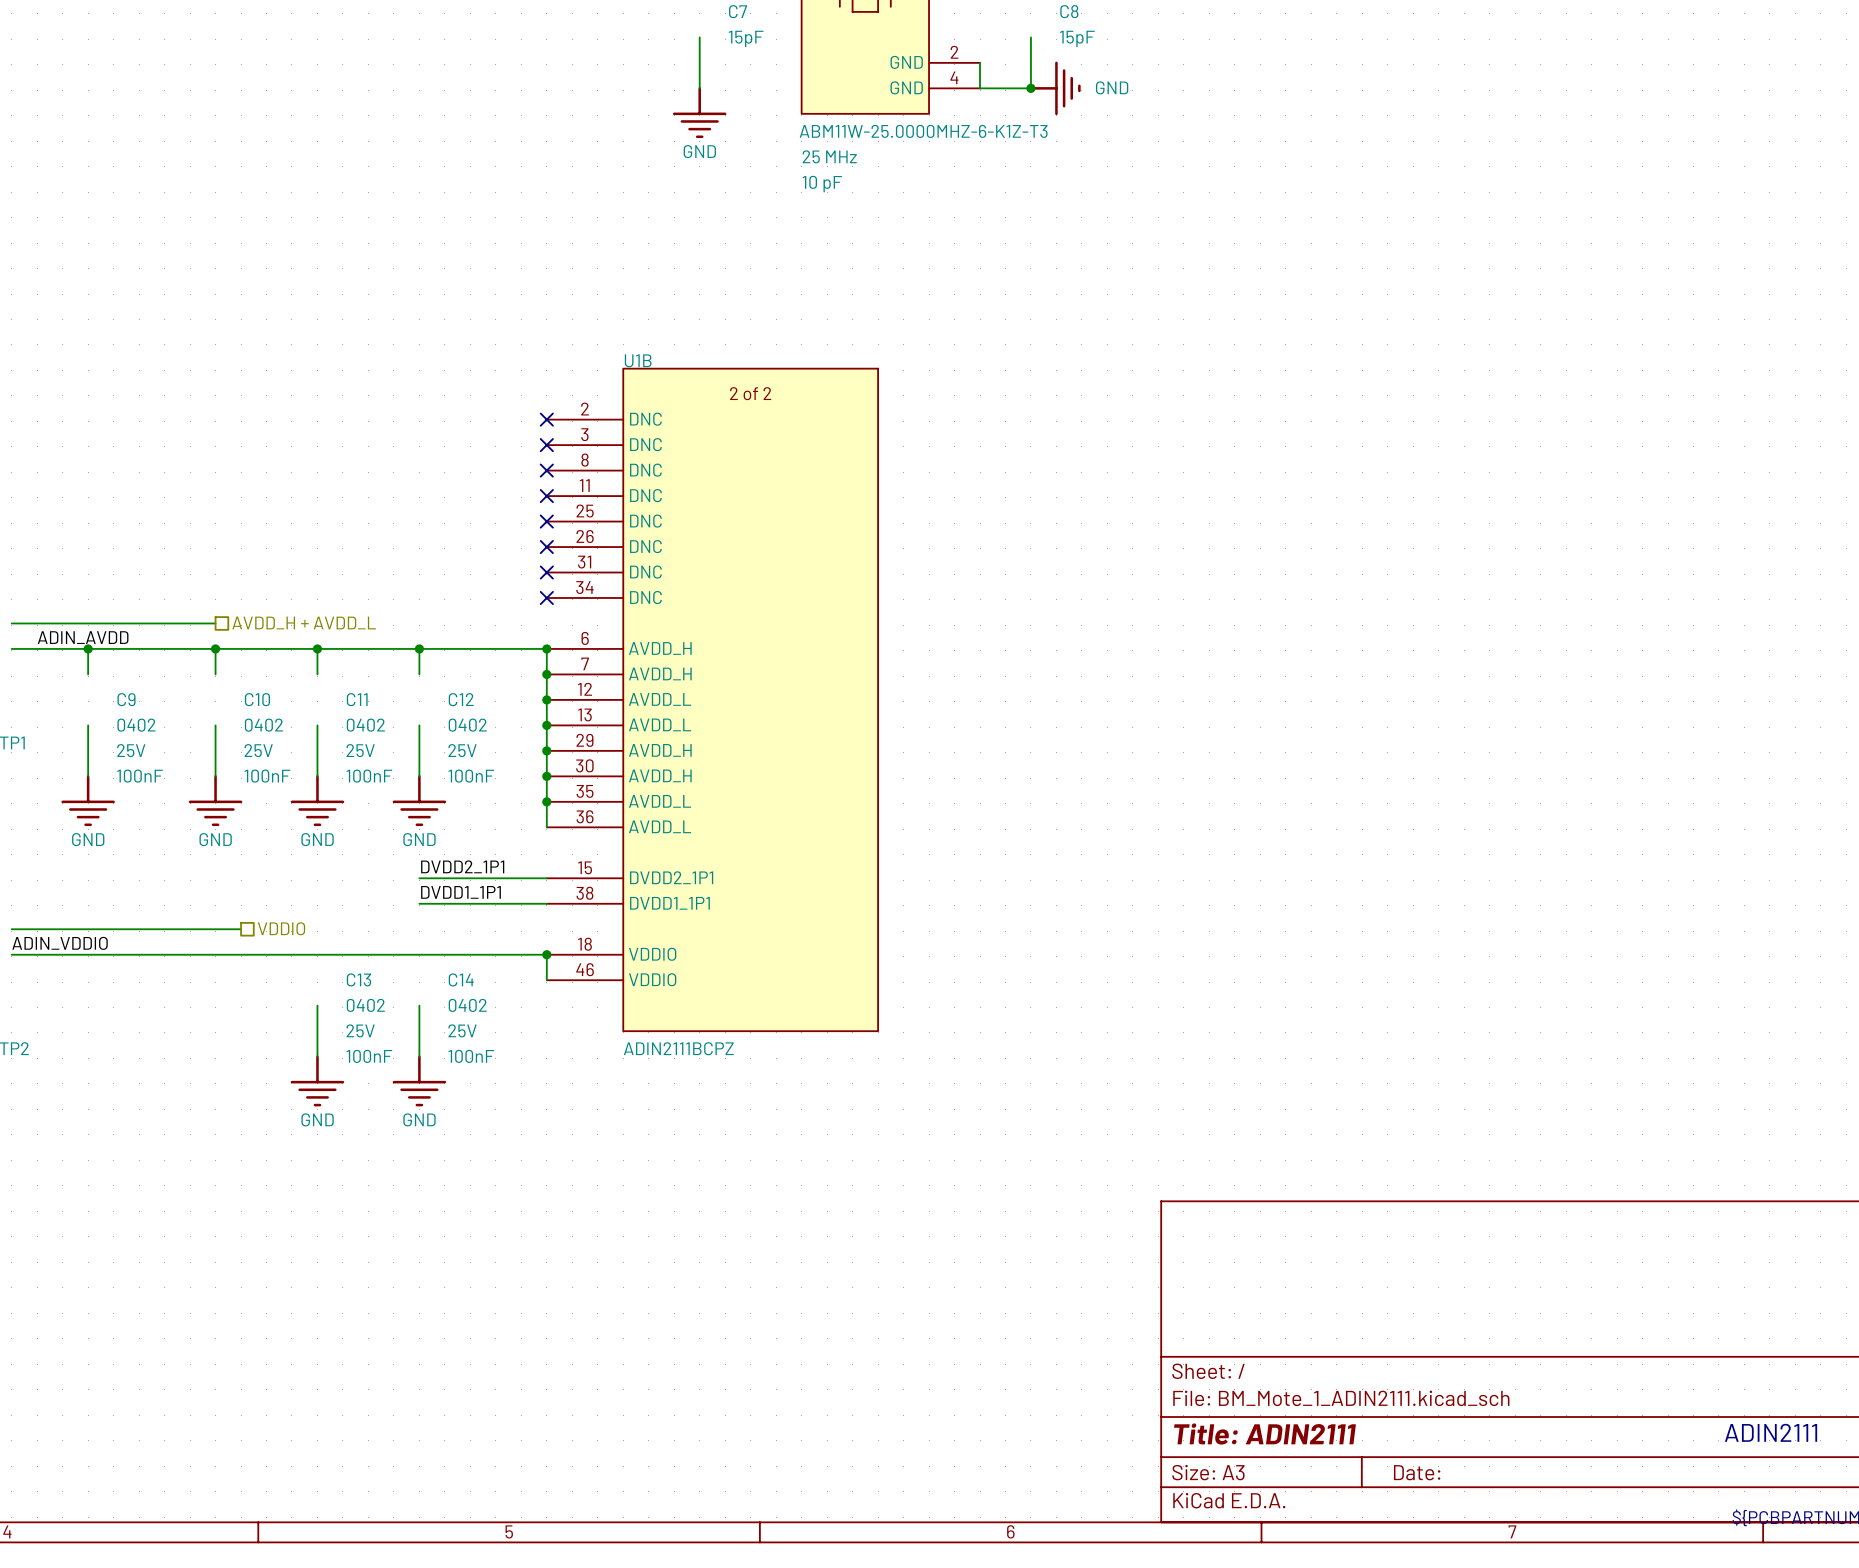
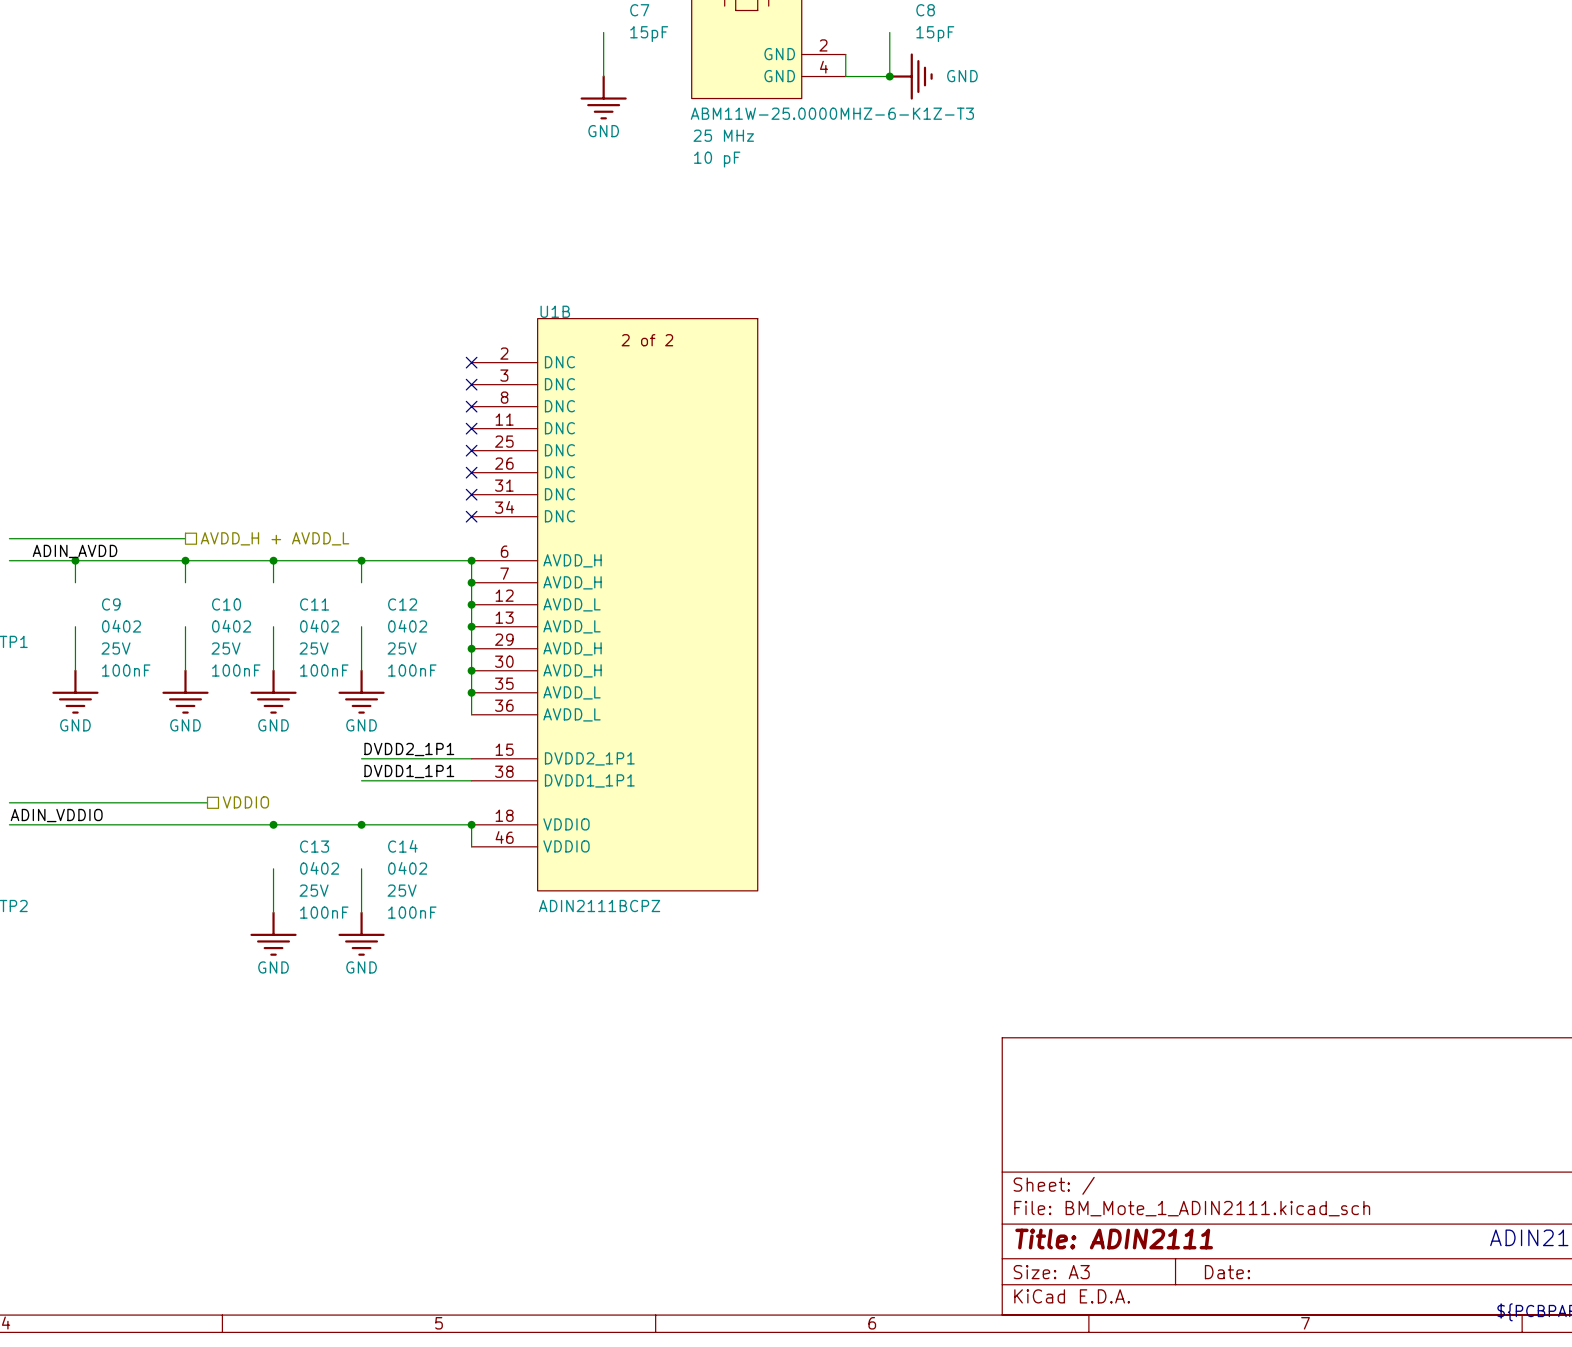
junction: none -> (273, 824)
junction: none -> (361, 824)

